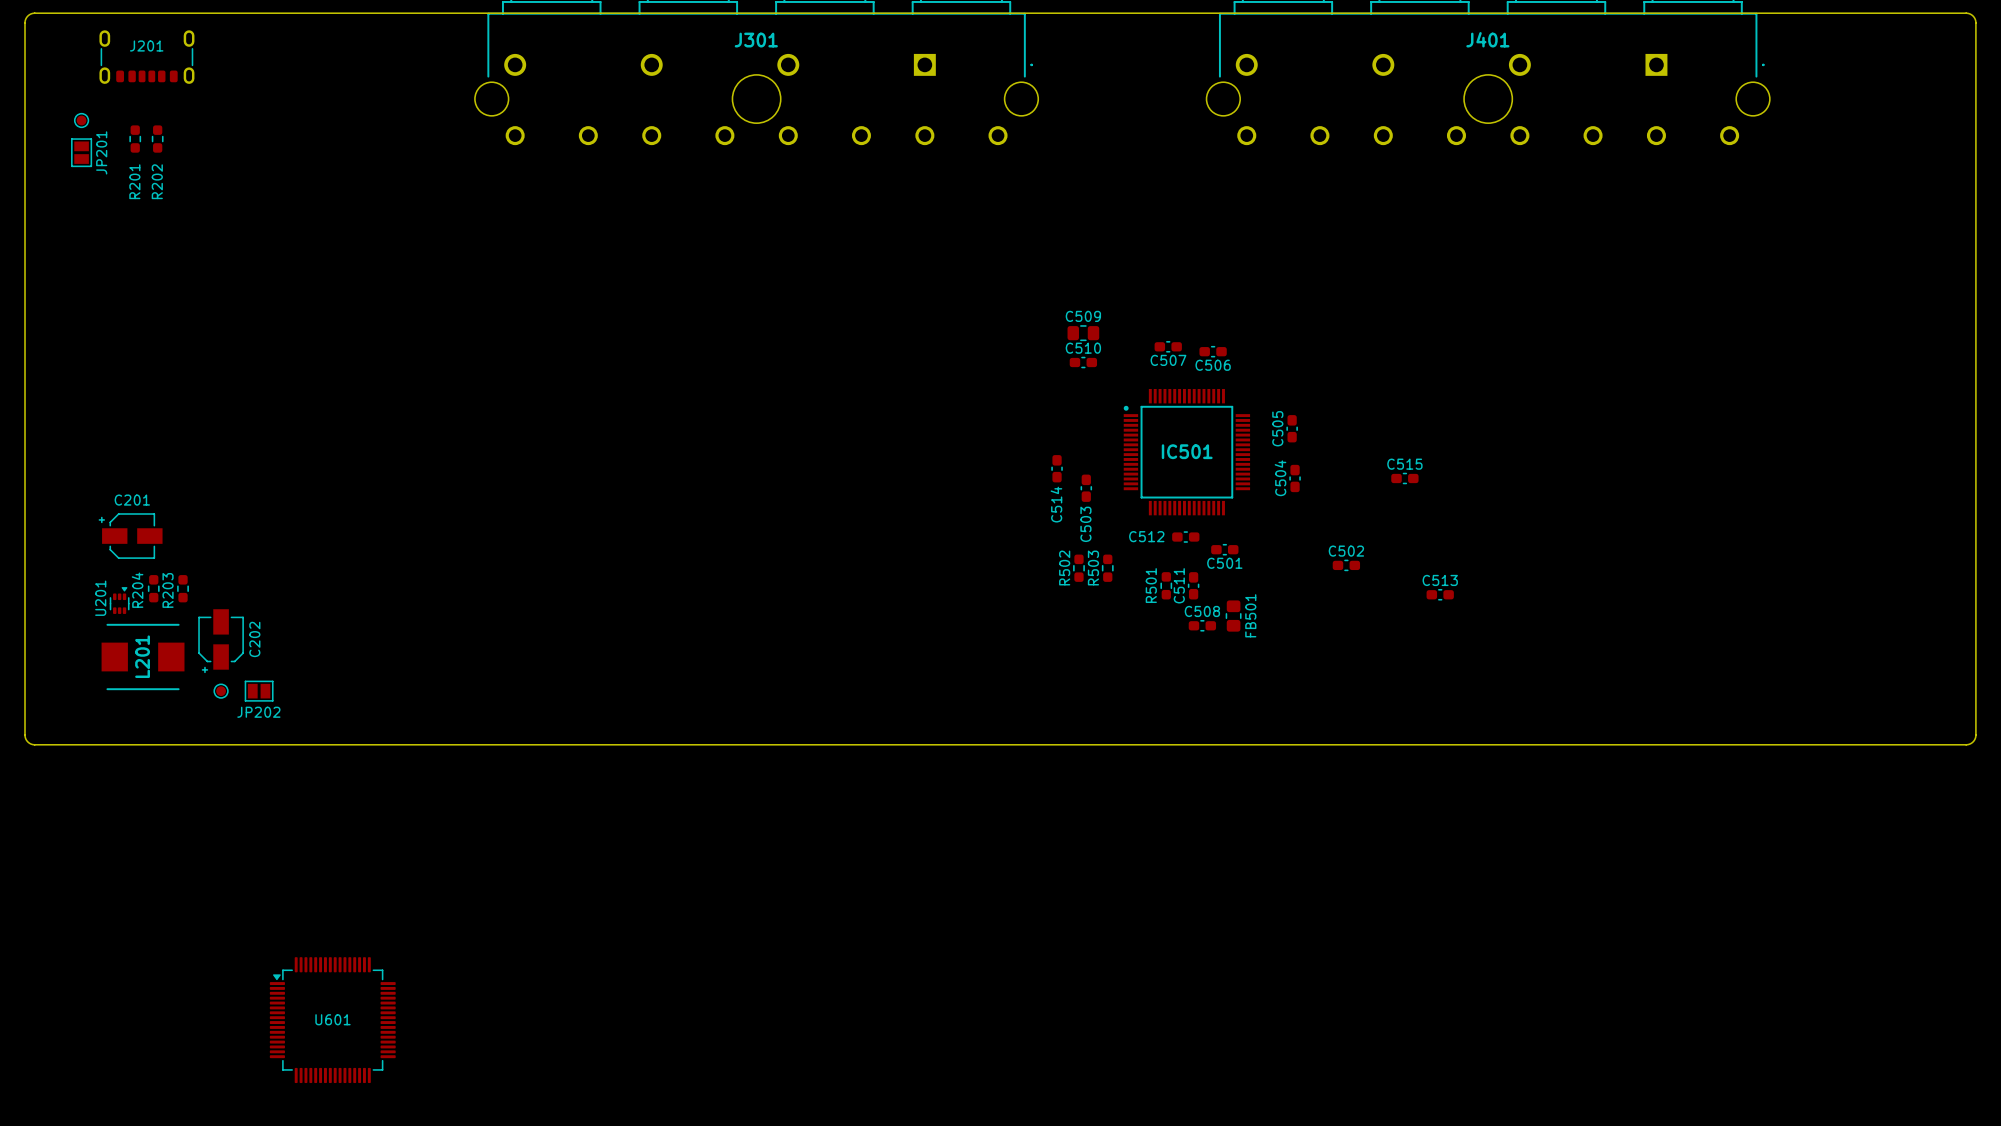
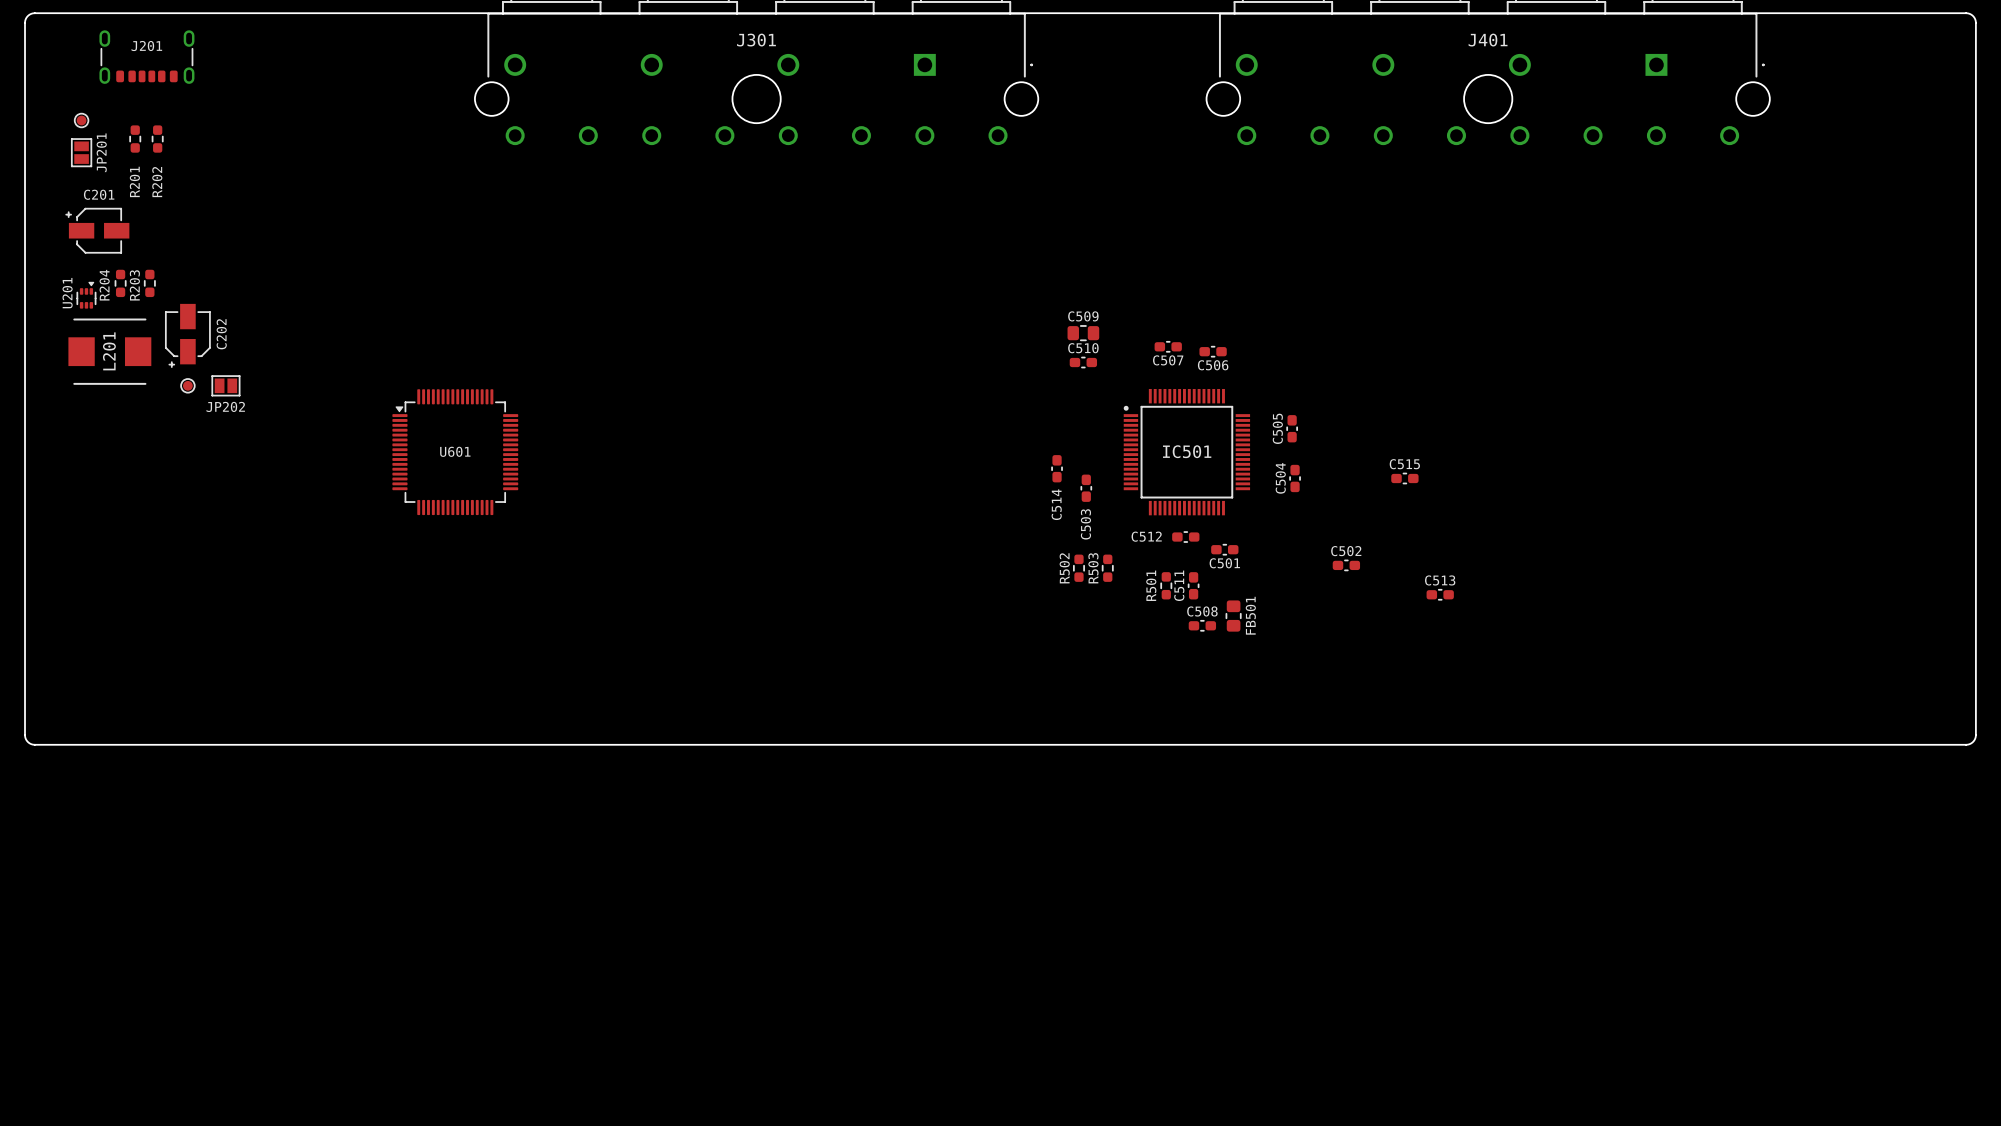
part: none -> (187, 385)
C201 position: (130, 536) -> (97, 230)
R204 position: (153, 588) -> (120, 283)
R203 position: (183, 588) -> (149, 283)
U201 position: (119, 600) -> (86, 295)
C202 position: (221, 641) -> (187, 335)
L201 position: (143, 657) -> (109, 351)
part: (221, 691) -> none
JP202 position: (259, 691) -> (225, 385)
U601 position: (332, 1020) -> (455, 452)

